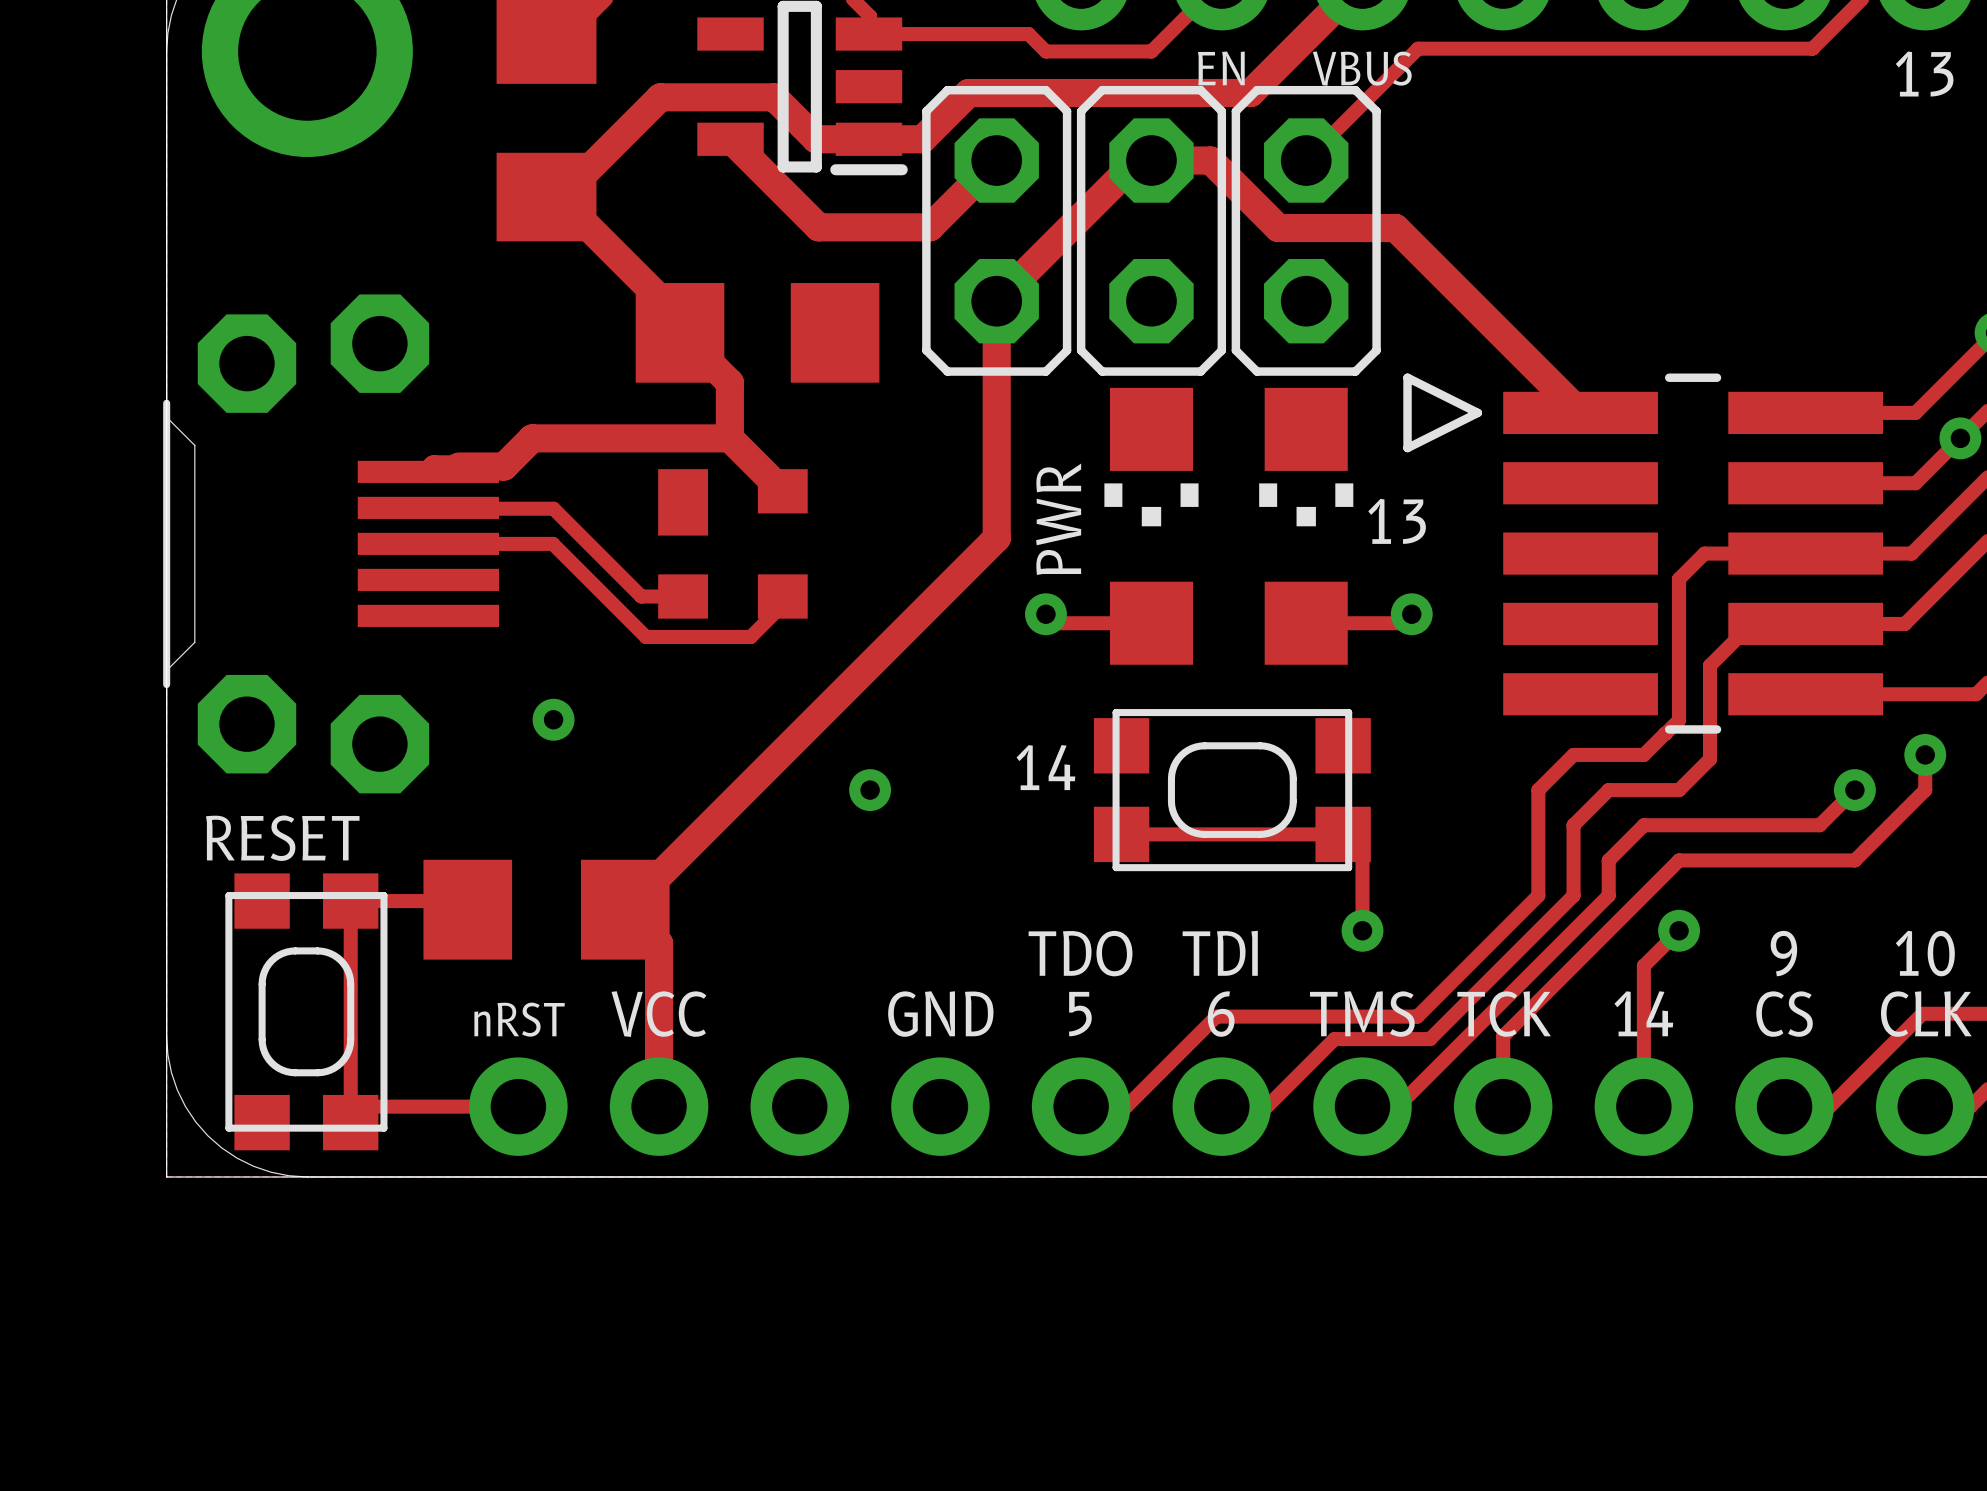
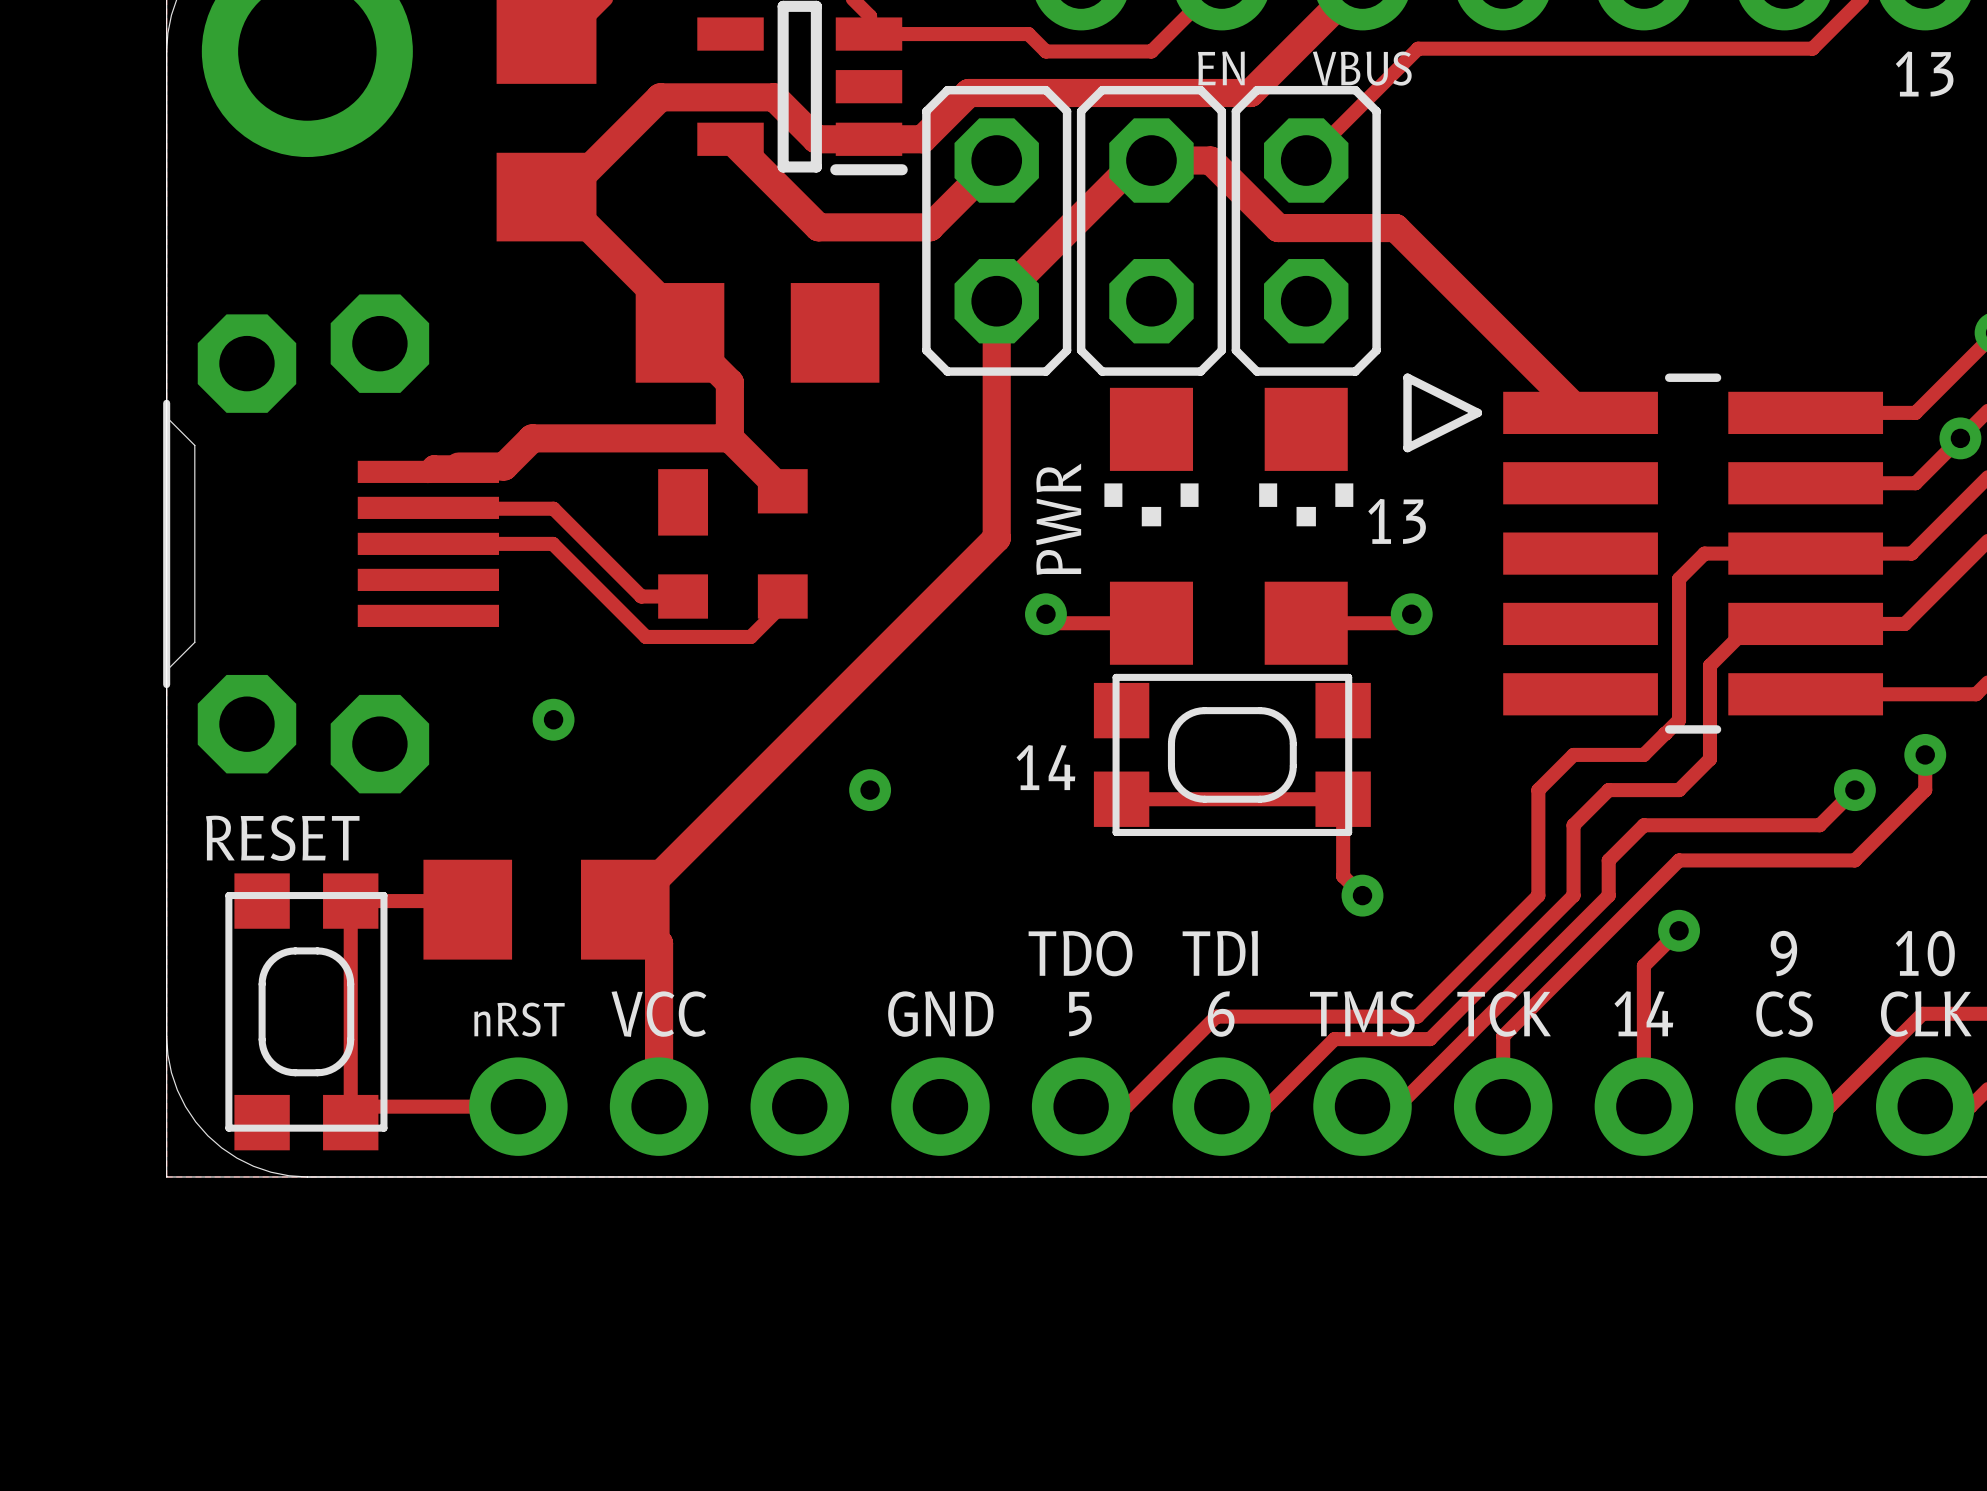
part position: (1232, 790) -> (1232, 754)
track: none -> (1121, 799) (1343, 799) (1343, 876) (1362, 895)
track: (1121, 834) (1343, 834) (1362, 853) (1362, 930) -> none
via position: (1362, 930) -> (1362, 895)

